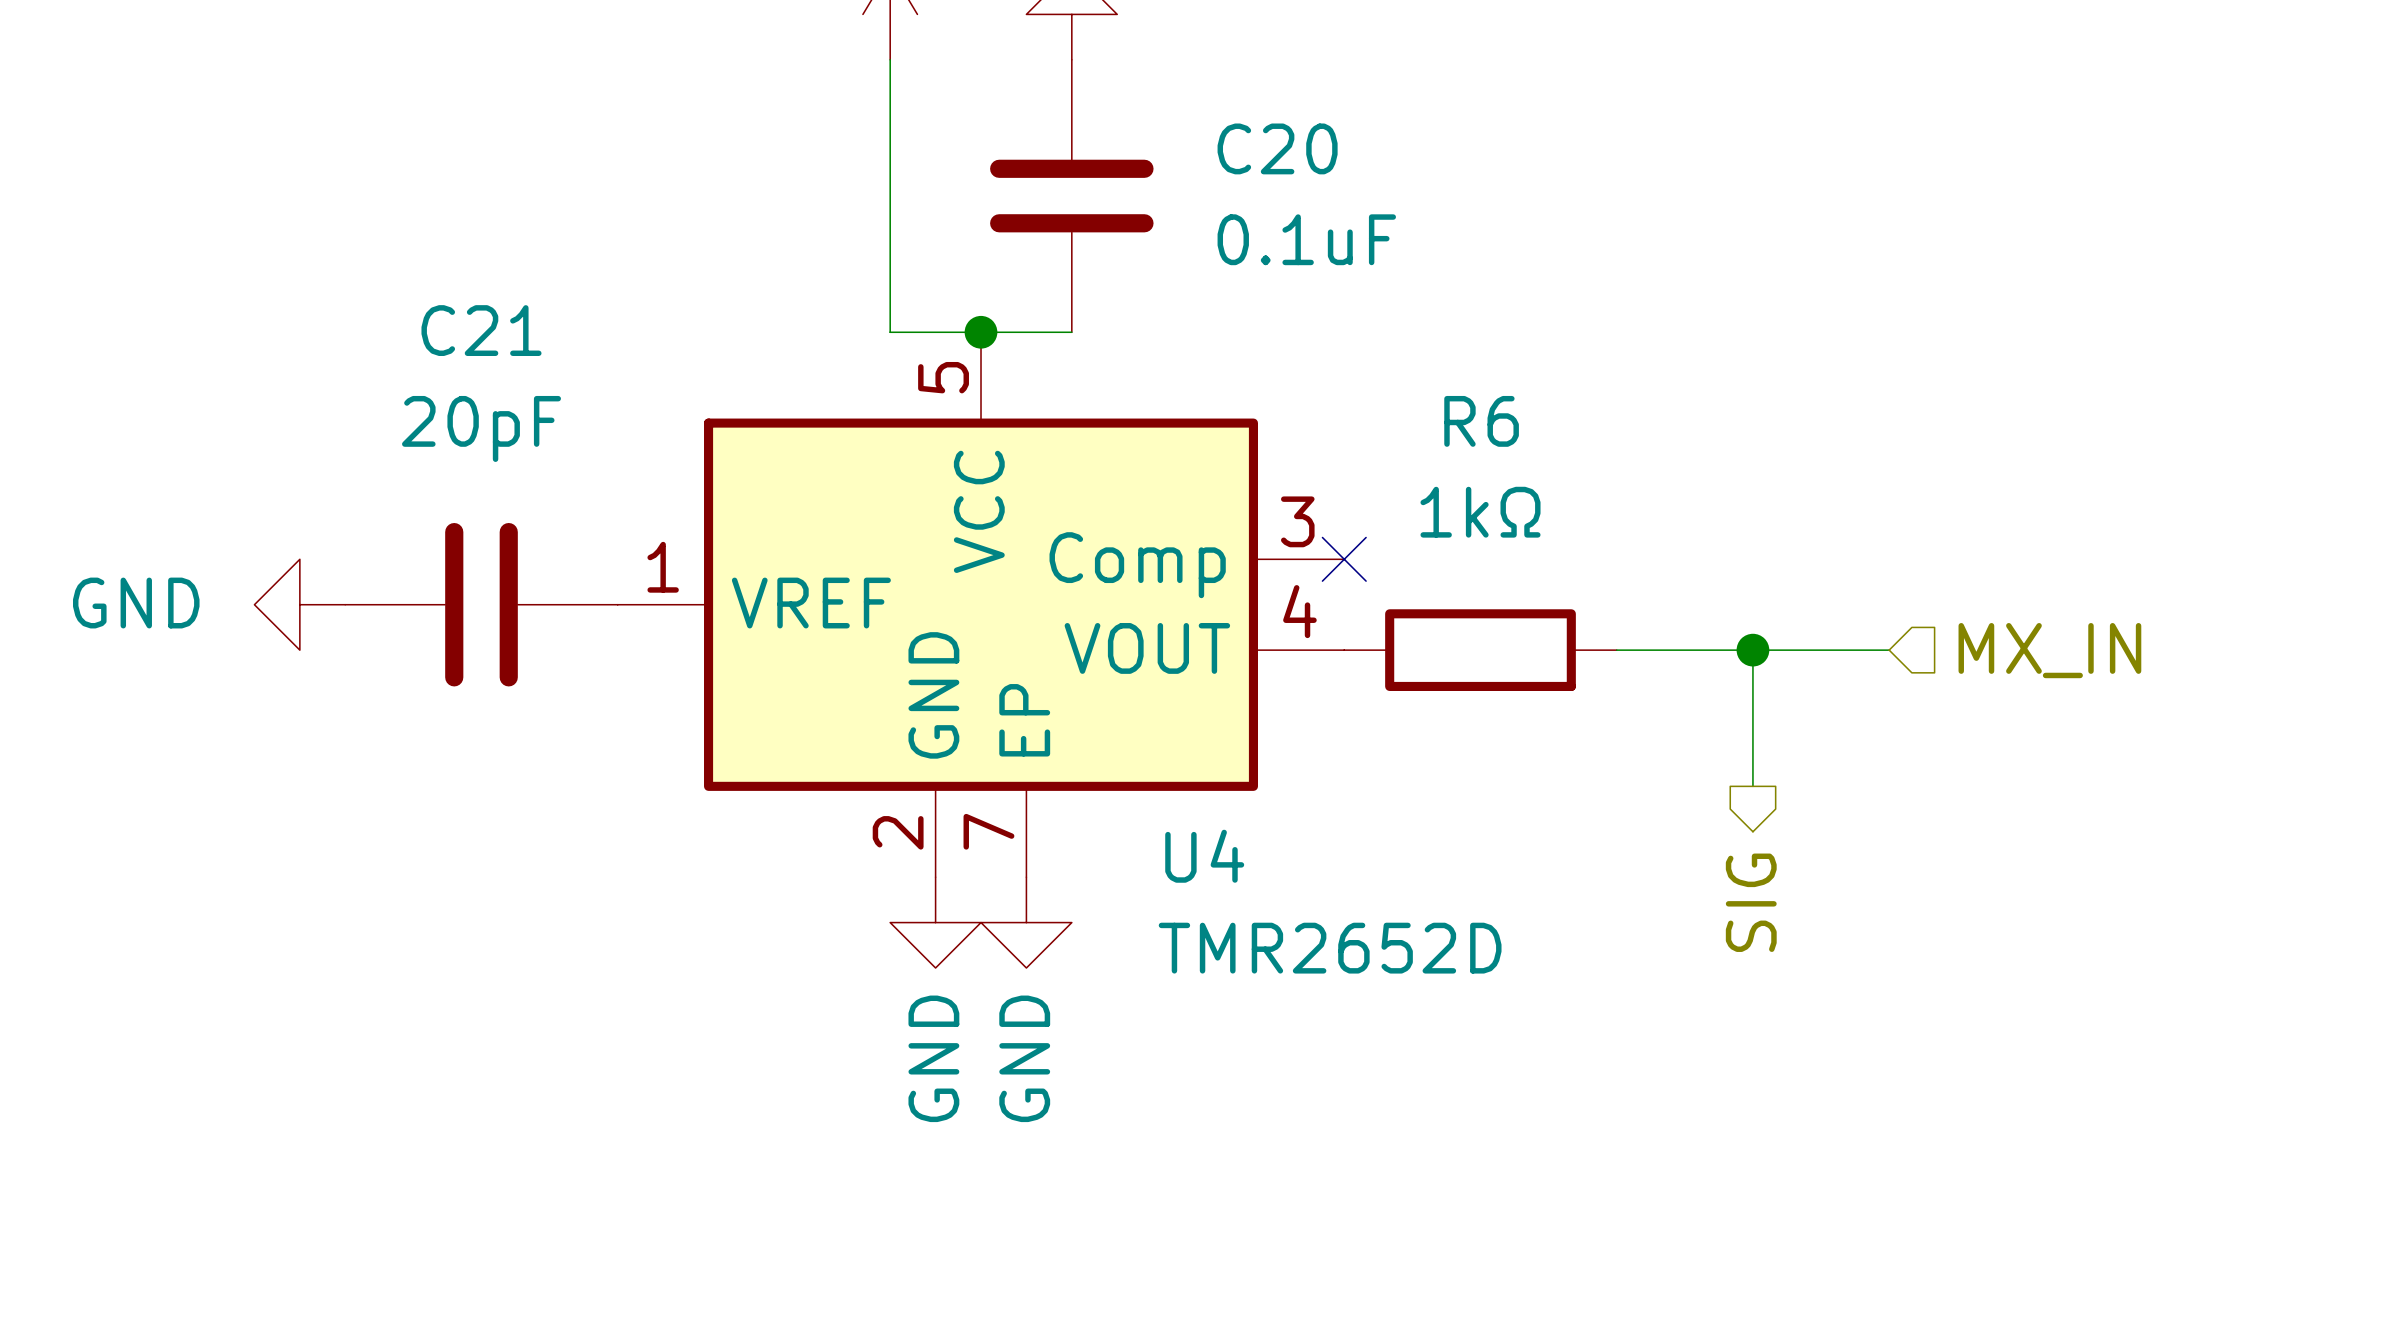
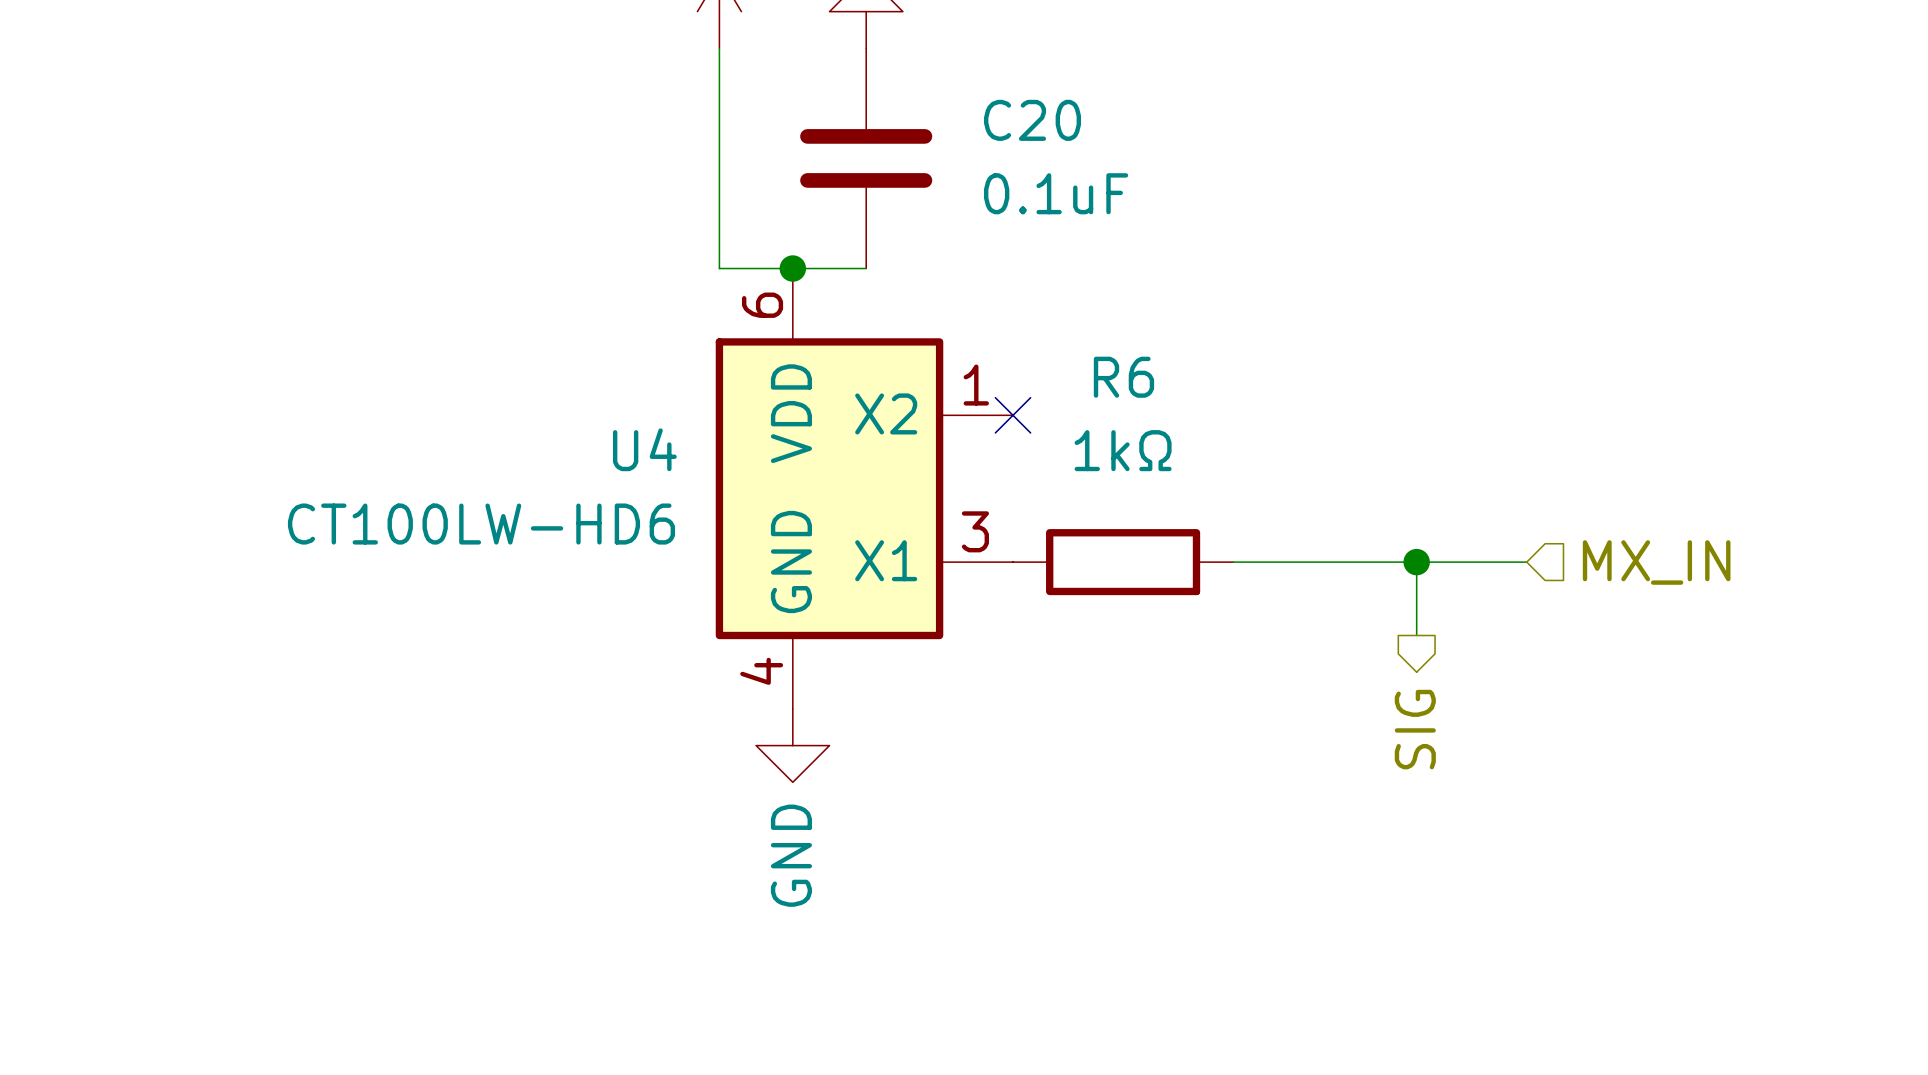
U4 symbol: [617, 332, 1345, 878] -> [715, 268, 1013, 709]
no-connect mark position: (1344, 559) -> (1012, 415)
power symbol: GND (299, 604) -> none
C21: 20pF (481, 604) -> none
R6 position: (1480, 650) -> (1123, 562)
wire: (1616, 650) (1889, 650) -> none
wire: (1752, 650) (1752, 695) -> none
junction position: (1752, 650) -> (1416, 562)
hierarchical label position: MX_IN (2049, 650) -> MX_IN (1656, 562)
wire: none -> (1233, 562) (1526, 562)
U4 name position: U4 (1204, 856) -> U4 (644, 449)
power symbol: GND (935, 922) -> none
power symbol: none -> GND (792, 745)
power symbol: GND (1026, 922) -> none
U4 value: TMR2652D (1330, 948) -> CT100LW-HD6 (481, 524)

